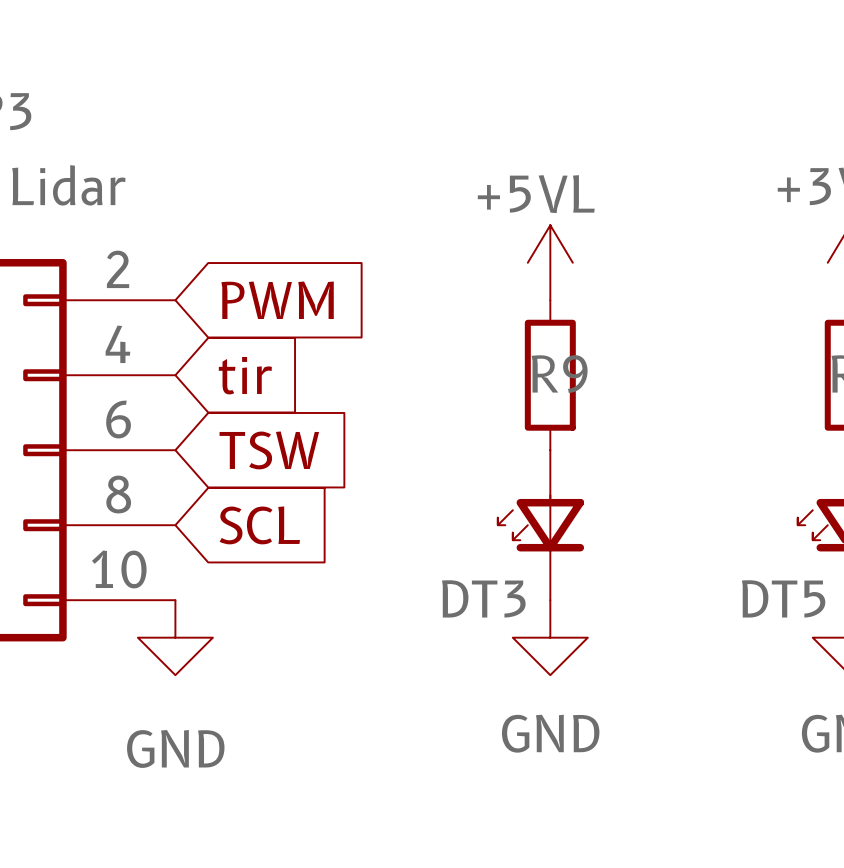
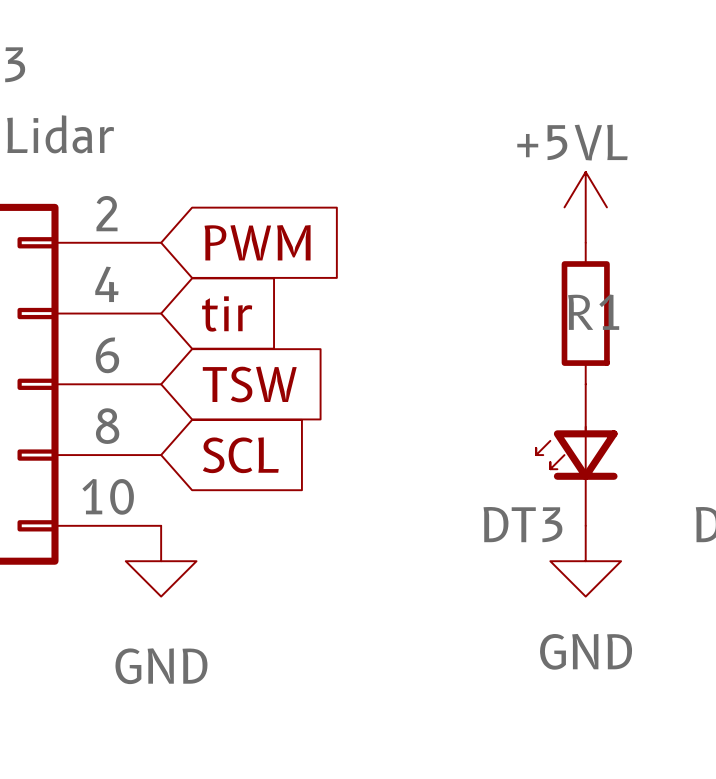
power symbol position: +5VL (550, 262) -> +5VL (585, 207)
R9: (550, 375) -> none
R1: none -> (585, 313)
DT3 position: (540, 525) -> (576, 455)
power symbol position: GND (550, 637) -> GND (585, 561)

